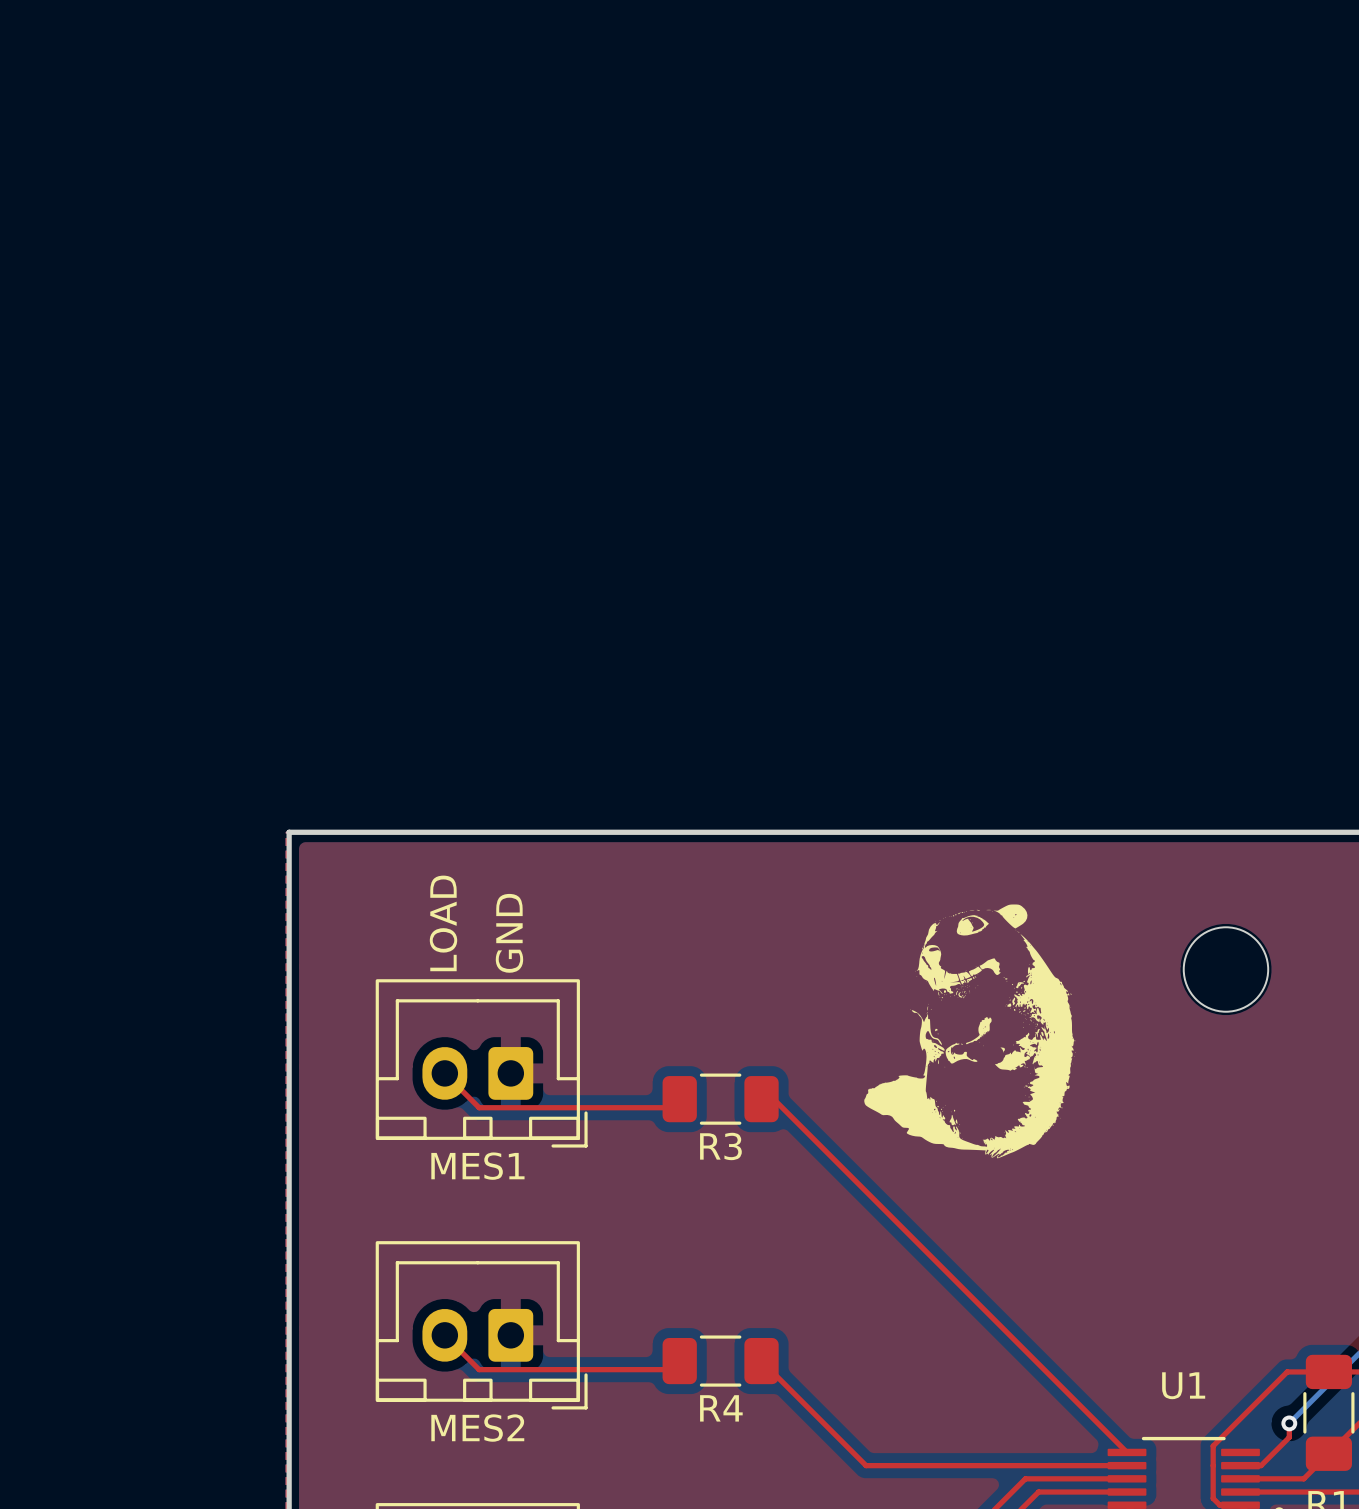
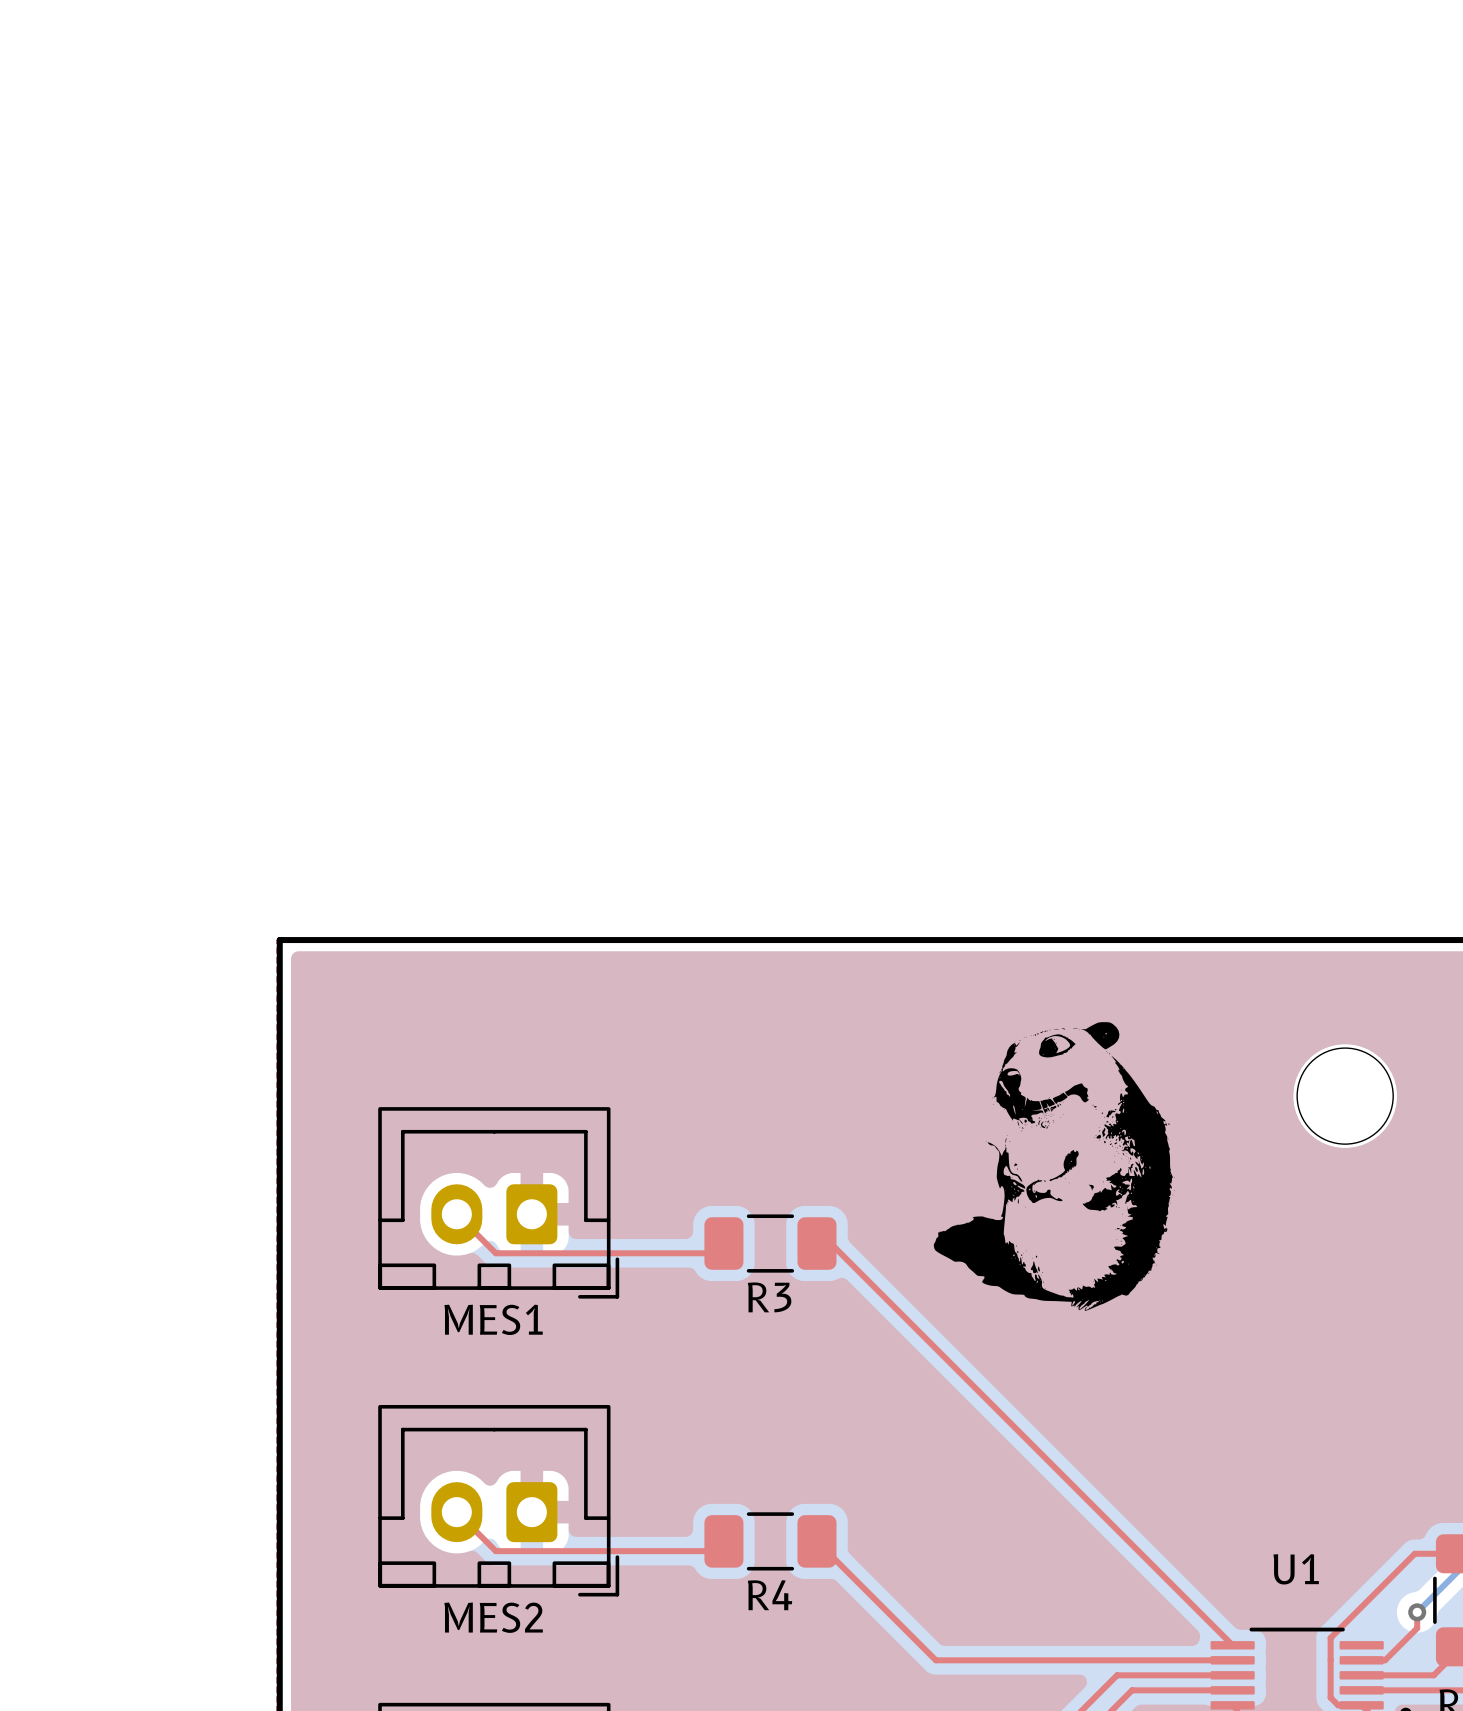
text: LOAD (443, 923) -> none
text: GND (509, 933) -> none

